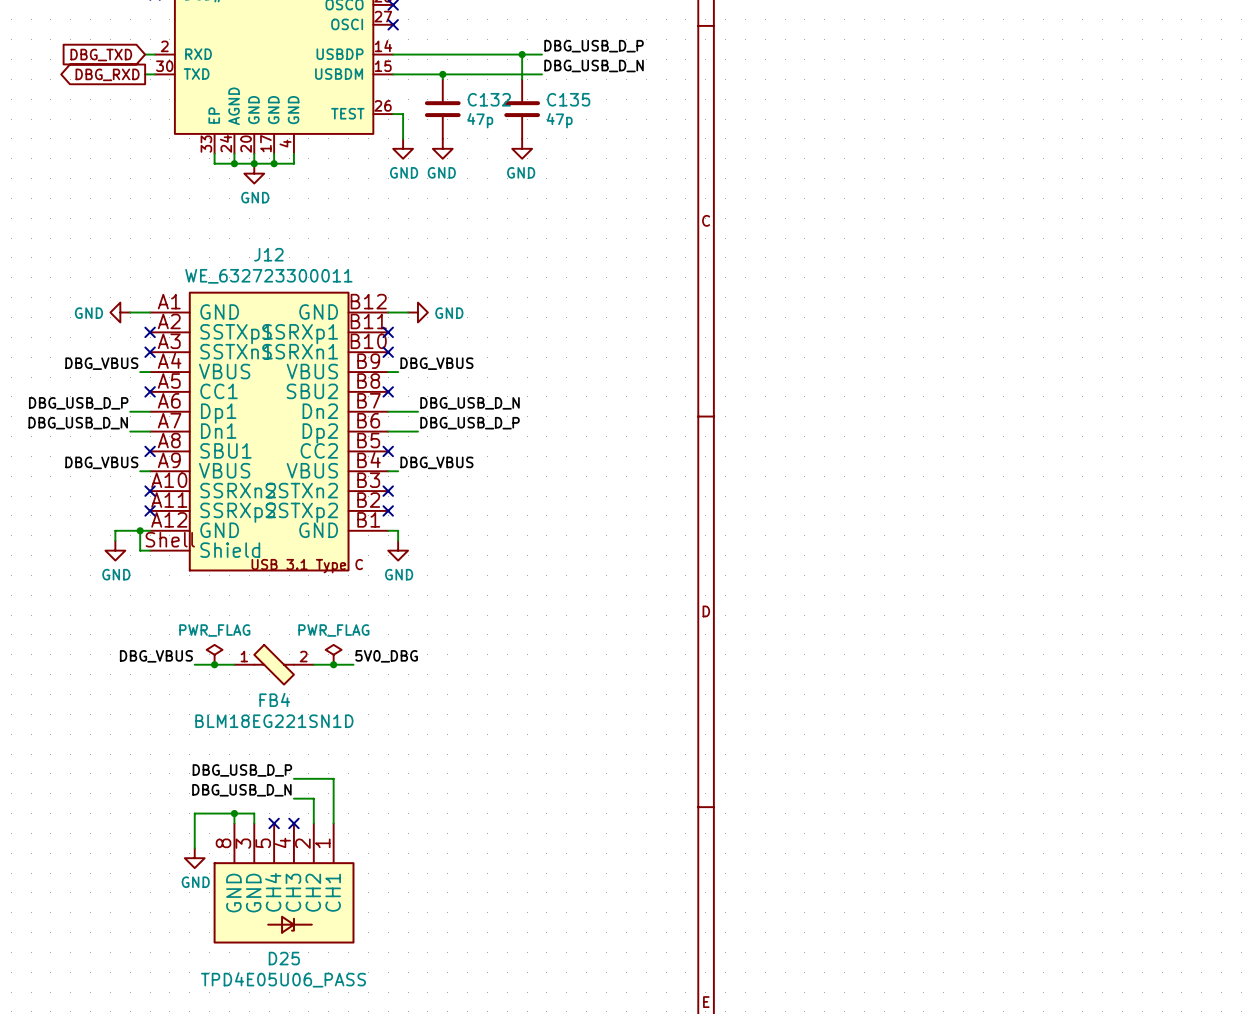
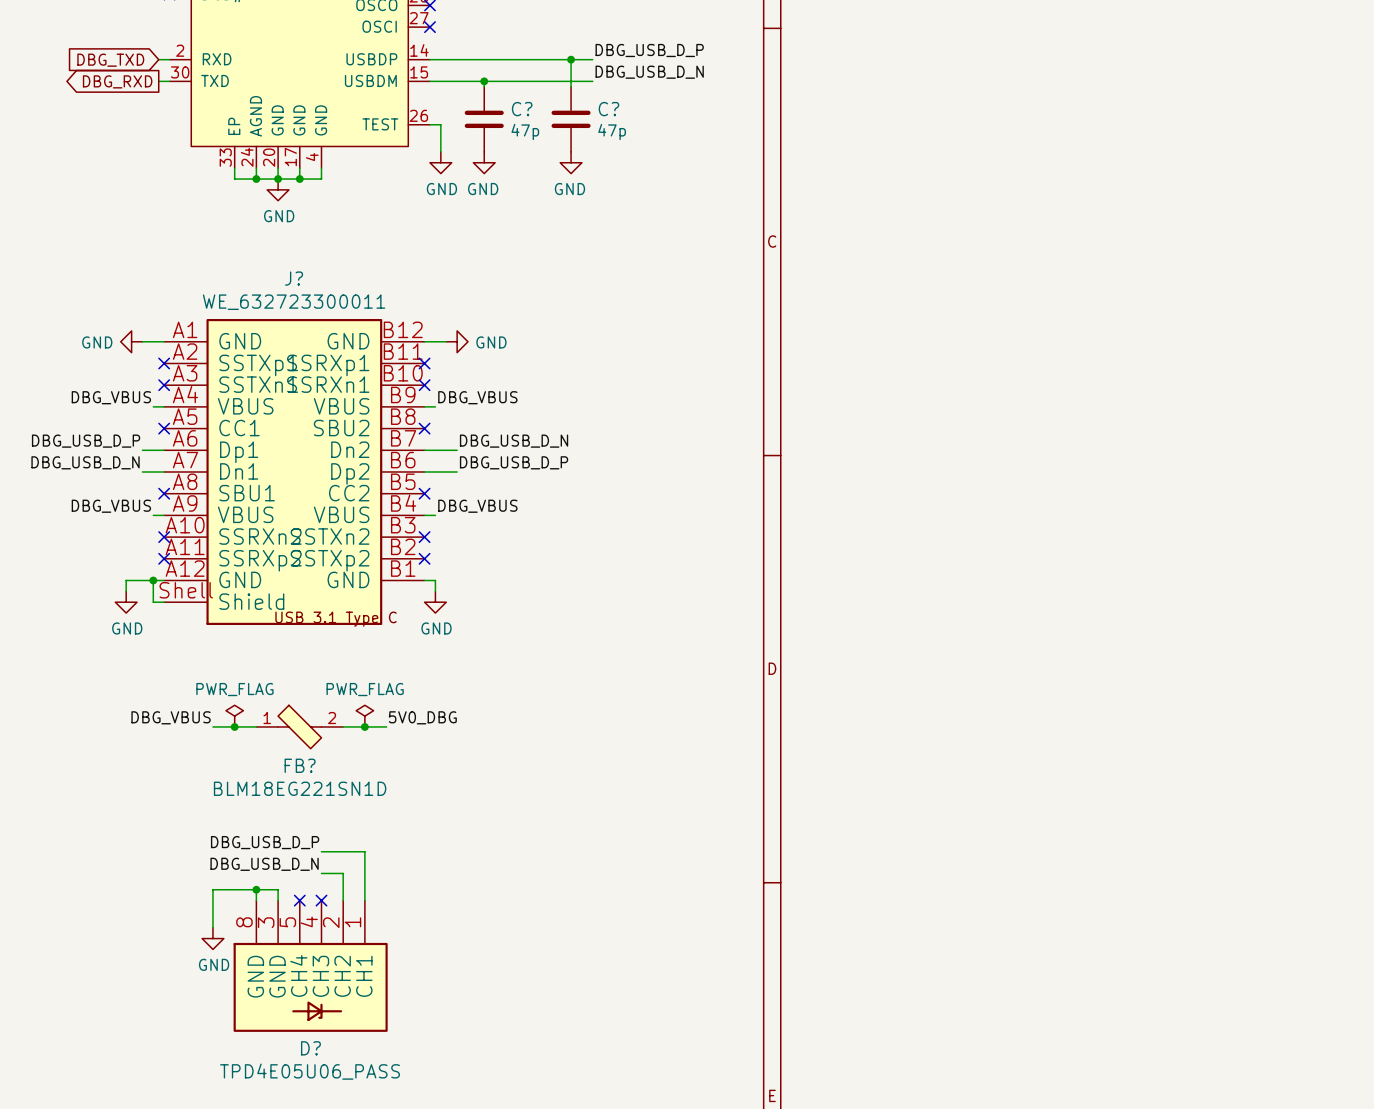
C132 name: C132 (489, 99) -> C? (522, 109)
C135 name: C135 (568, 99) -> C? (608, 109)
J12 name: J12 (268, 254) -> J? (294, 278)
FB4 name: FB4 (274, 699) -> FB? (300, 765)
D25 name: D25 (284, 958) -> D? (310, 1048)

